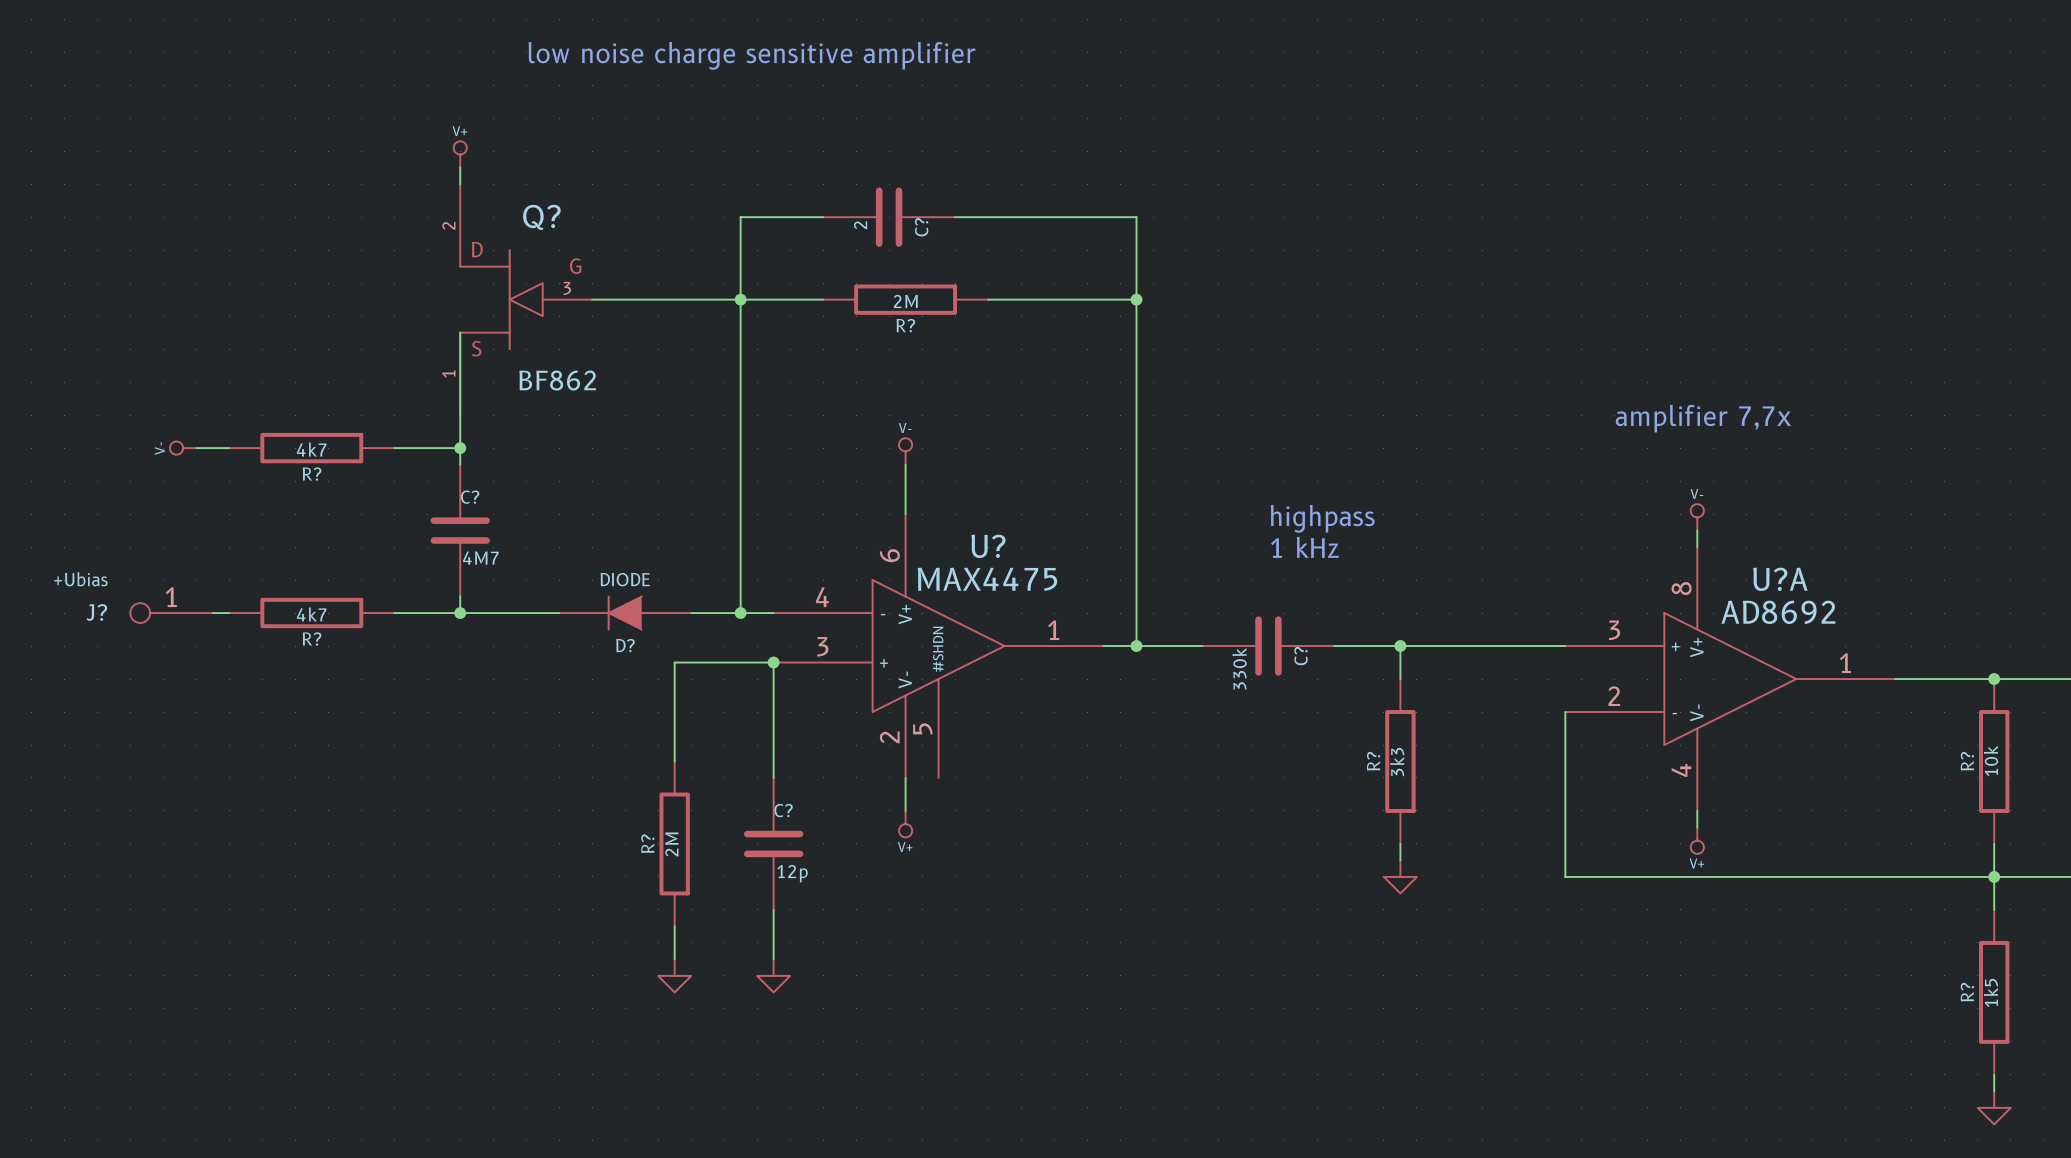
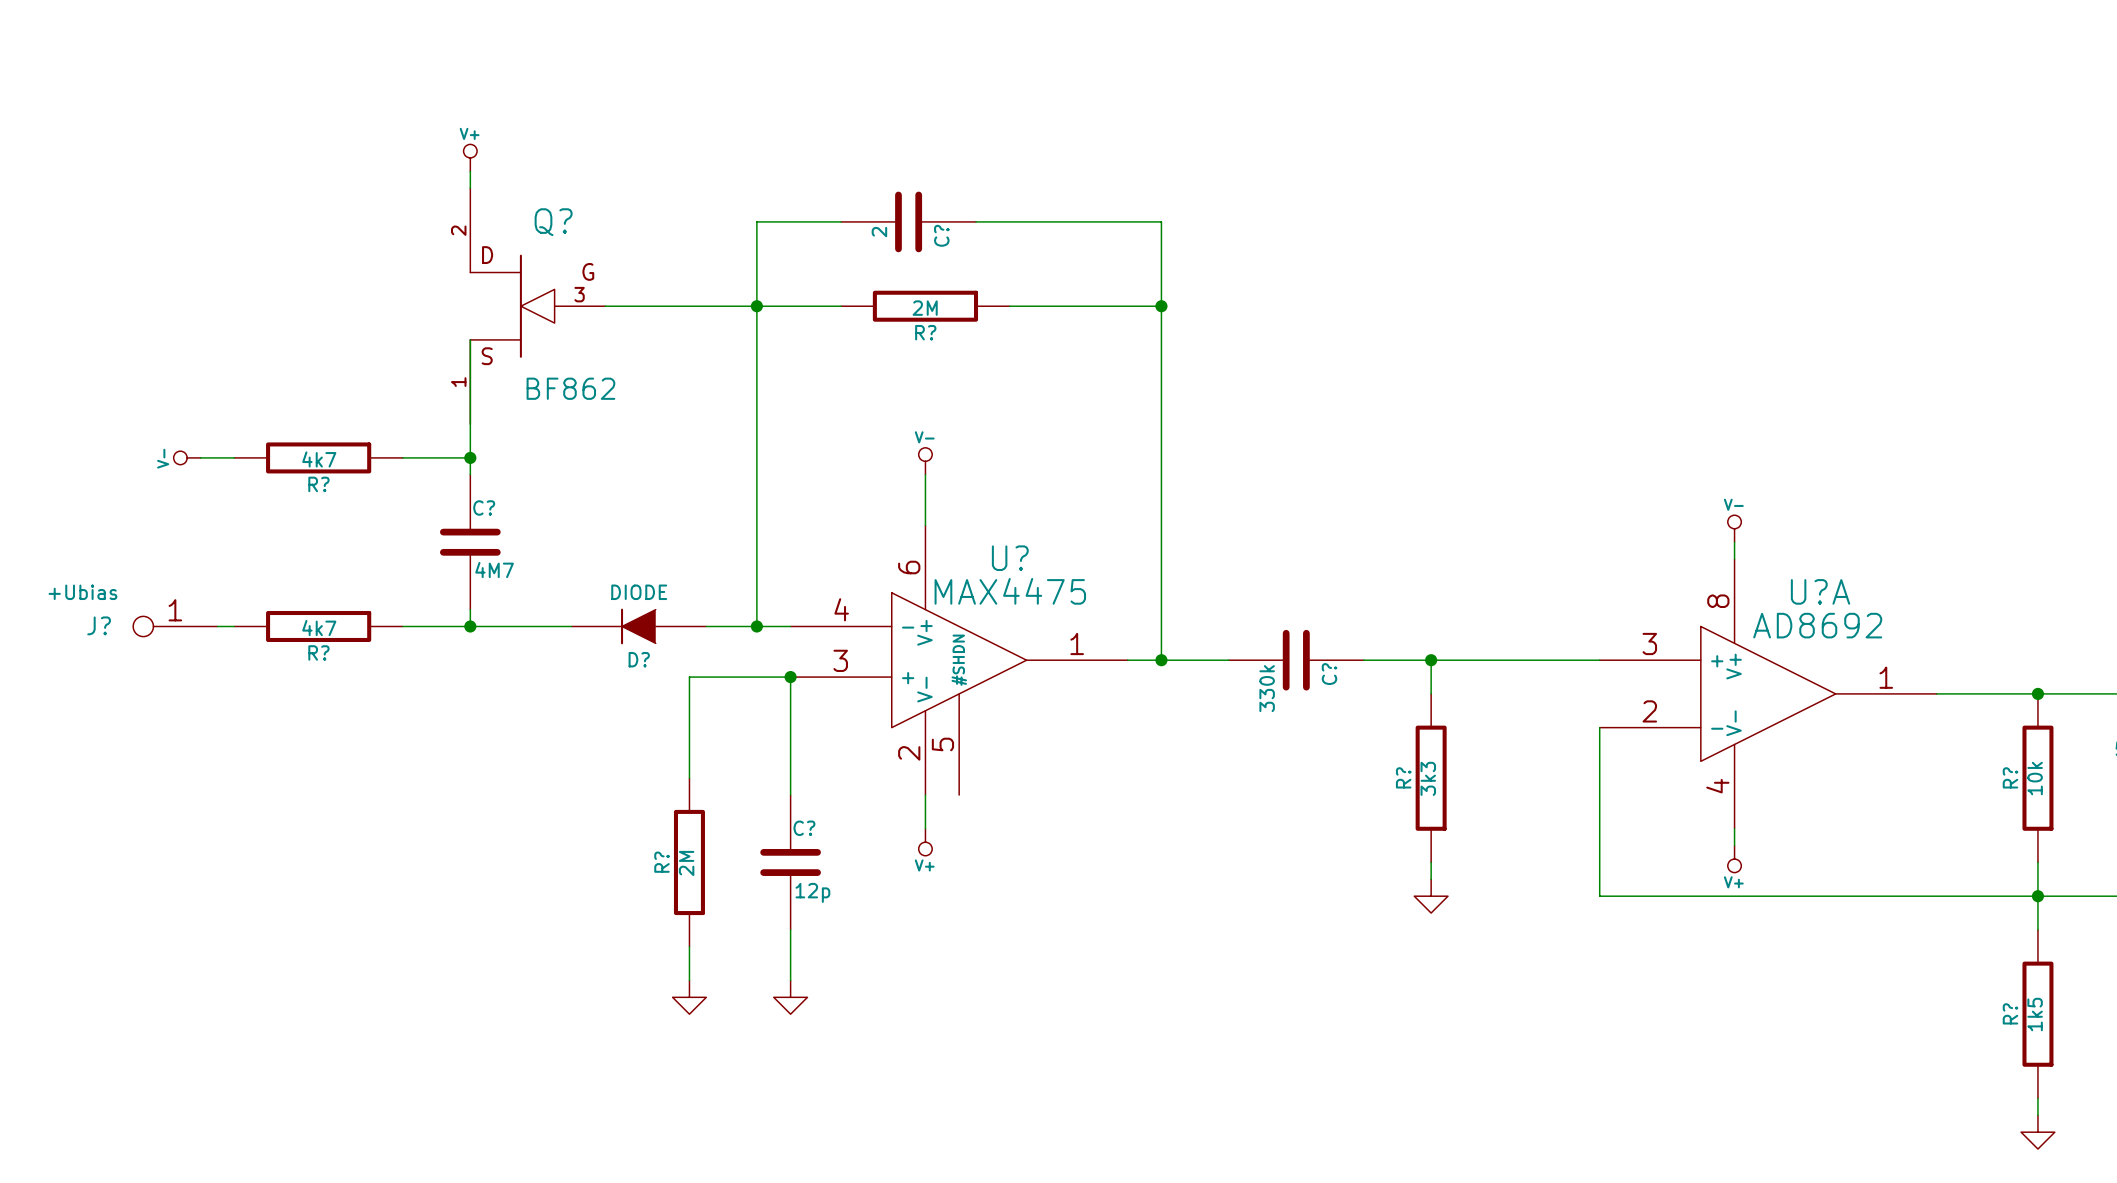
text: low noise charge sensitive amplifier (752, 55) -> none
text: amplifier 7,7x (1703, 418) -> none
text: highpass (1322, 518) -> none
text: 1 kHz (1304, 547) -> none

